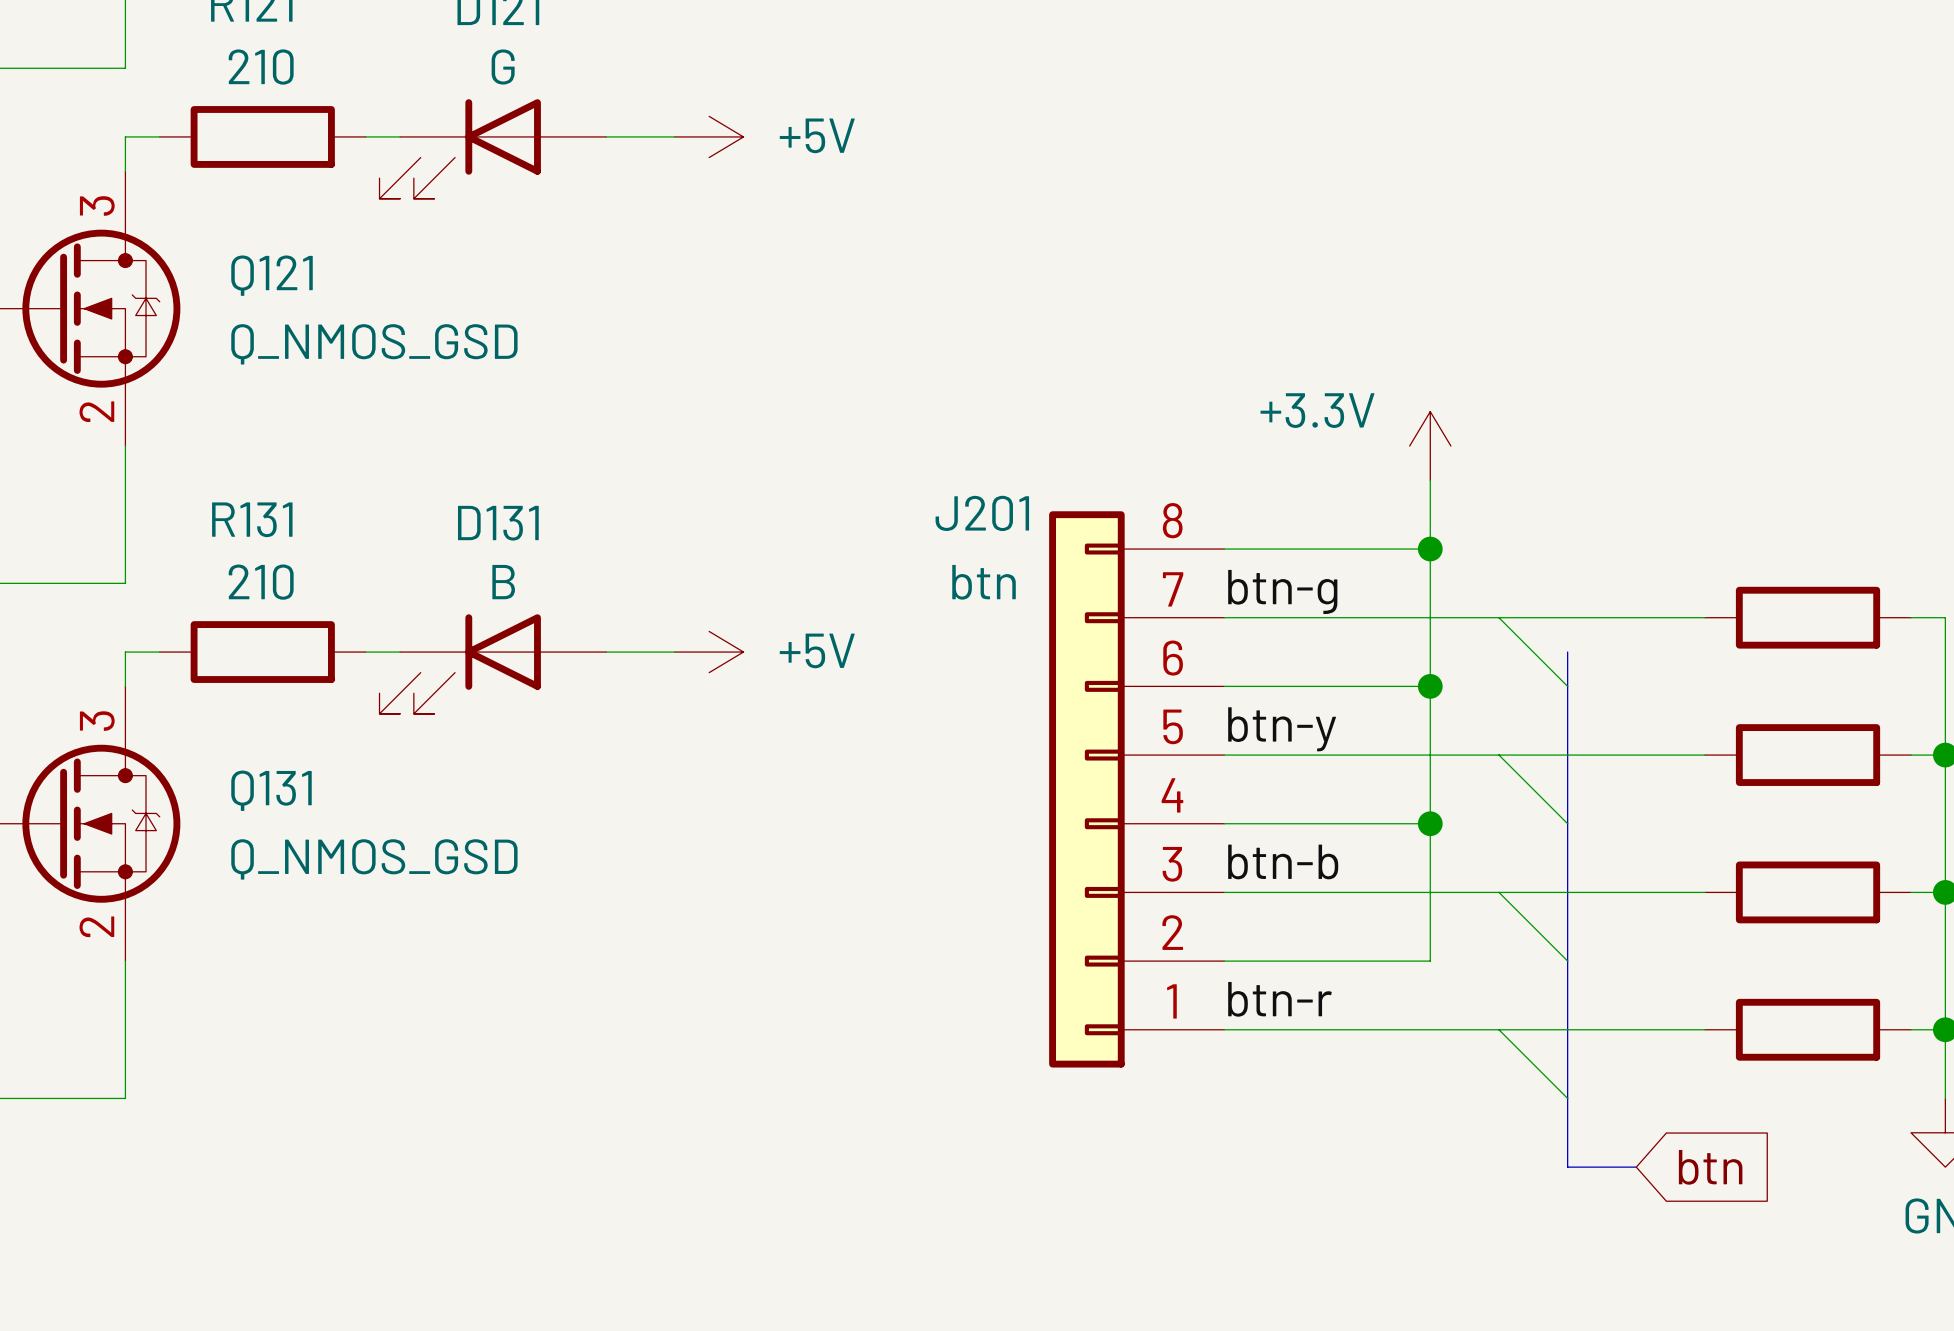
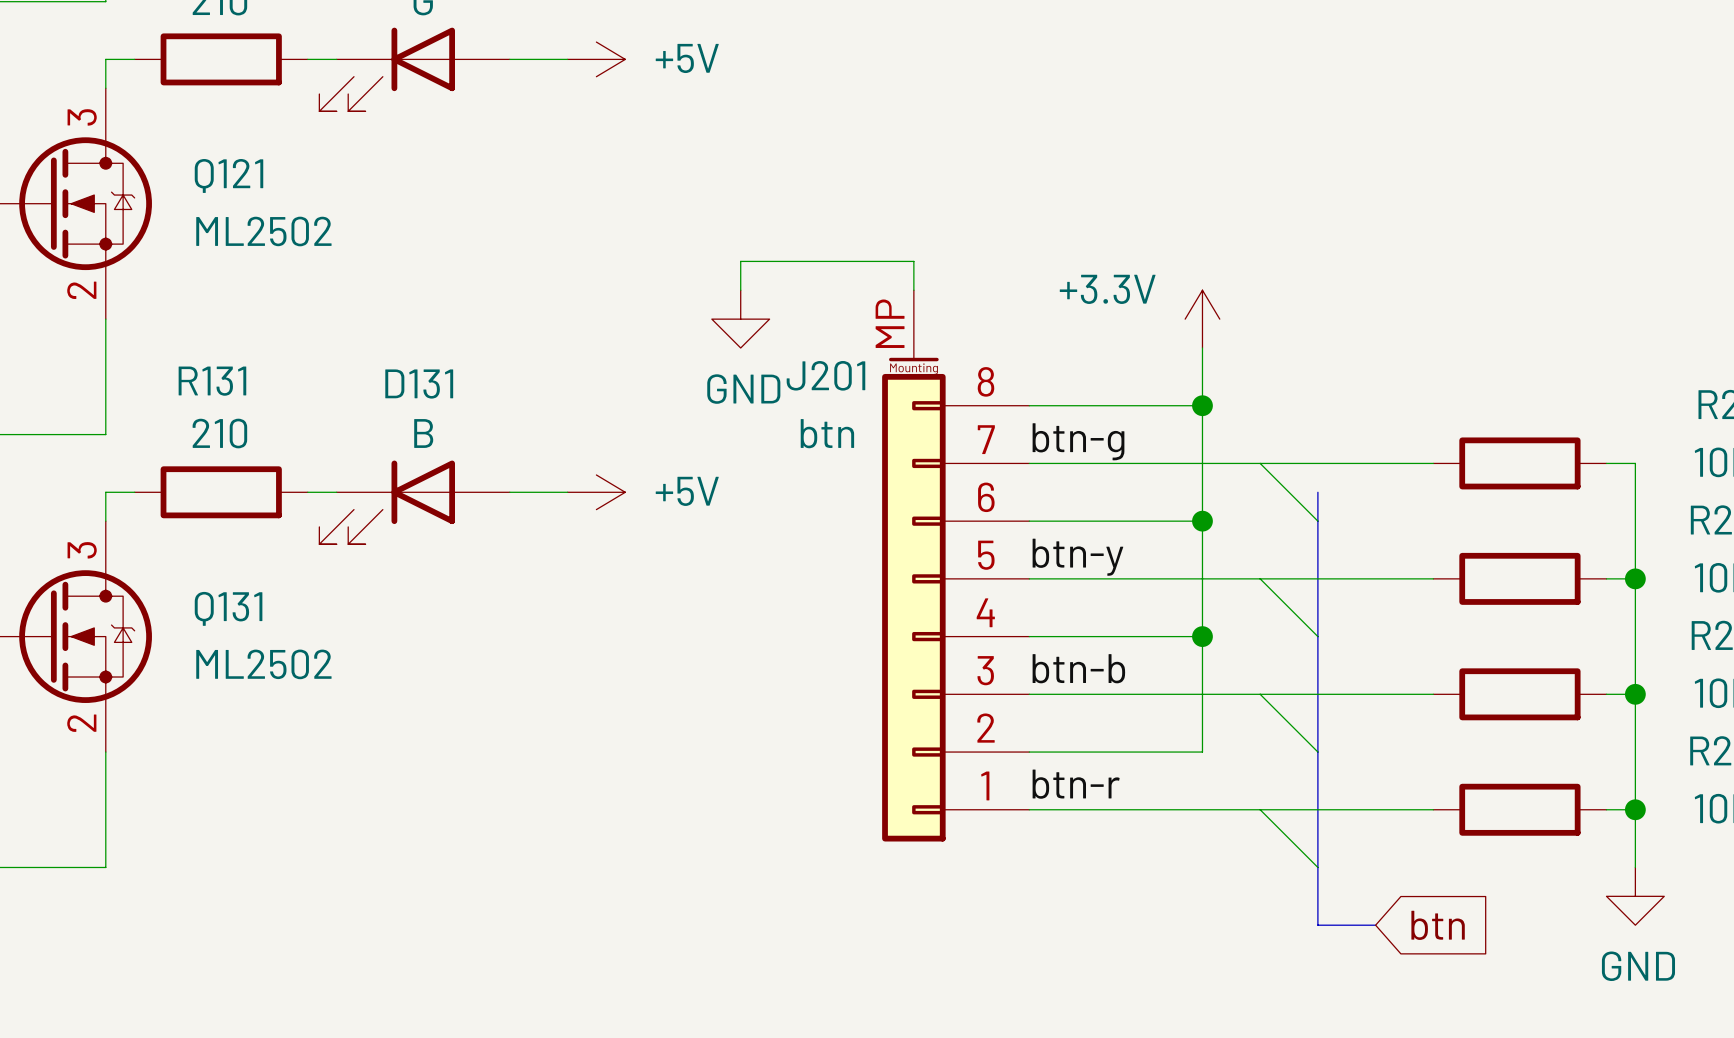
Q121 value: Q_NMOS_GSD (374, 344) -> ML2502 (263, 231)
wire: none -> (740, 290) (740, 261) (913, 261) (913, 290)
power symbol: none -> GND (740, 319)
J201 symbol: [1049, 511, 1225, 1068] -> [882, 290, 1030, 842]
Q131 value: Q_NMOS_GSD (374, 859) -> ML2502 (263, 664)

